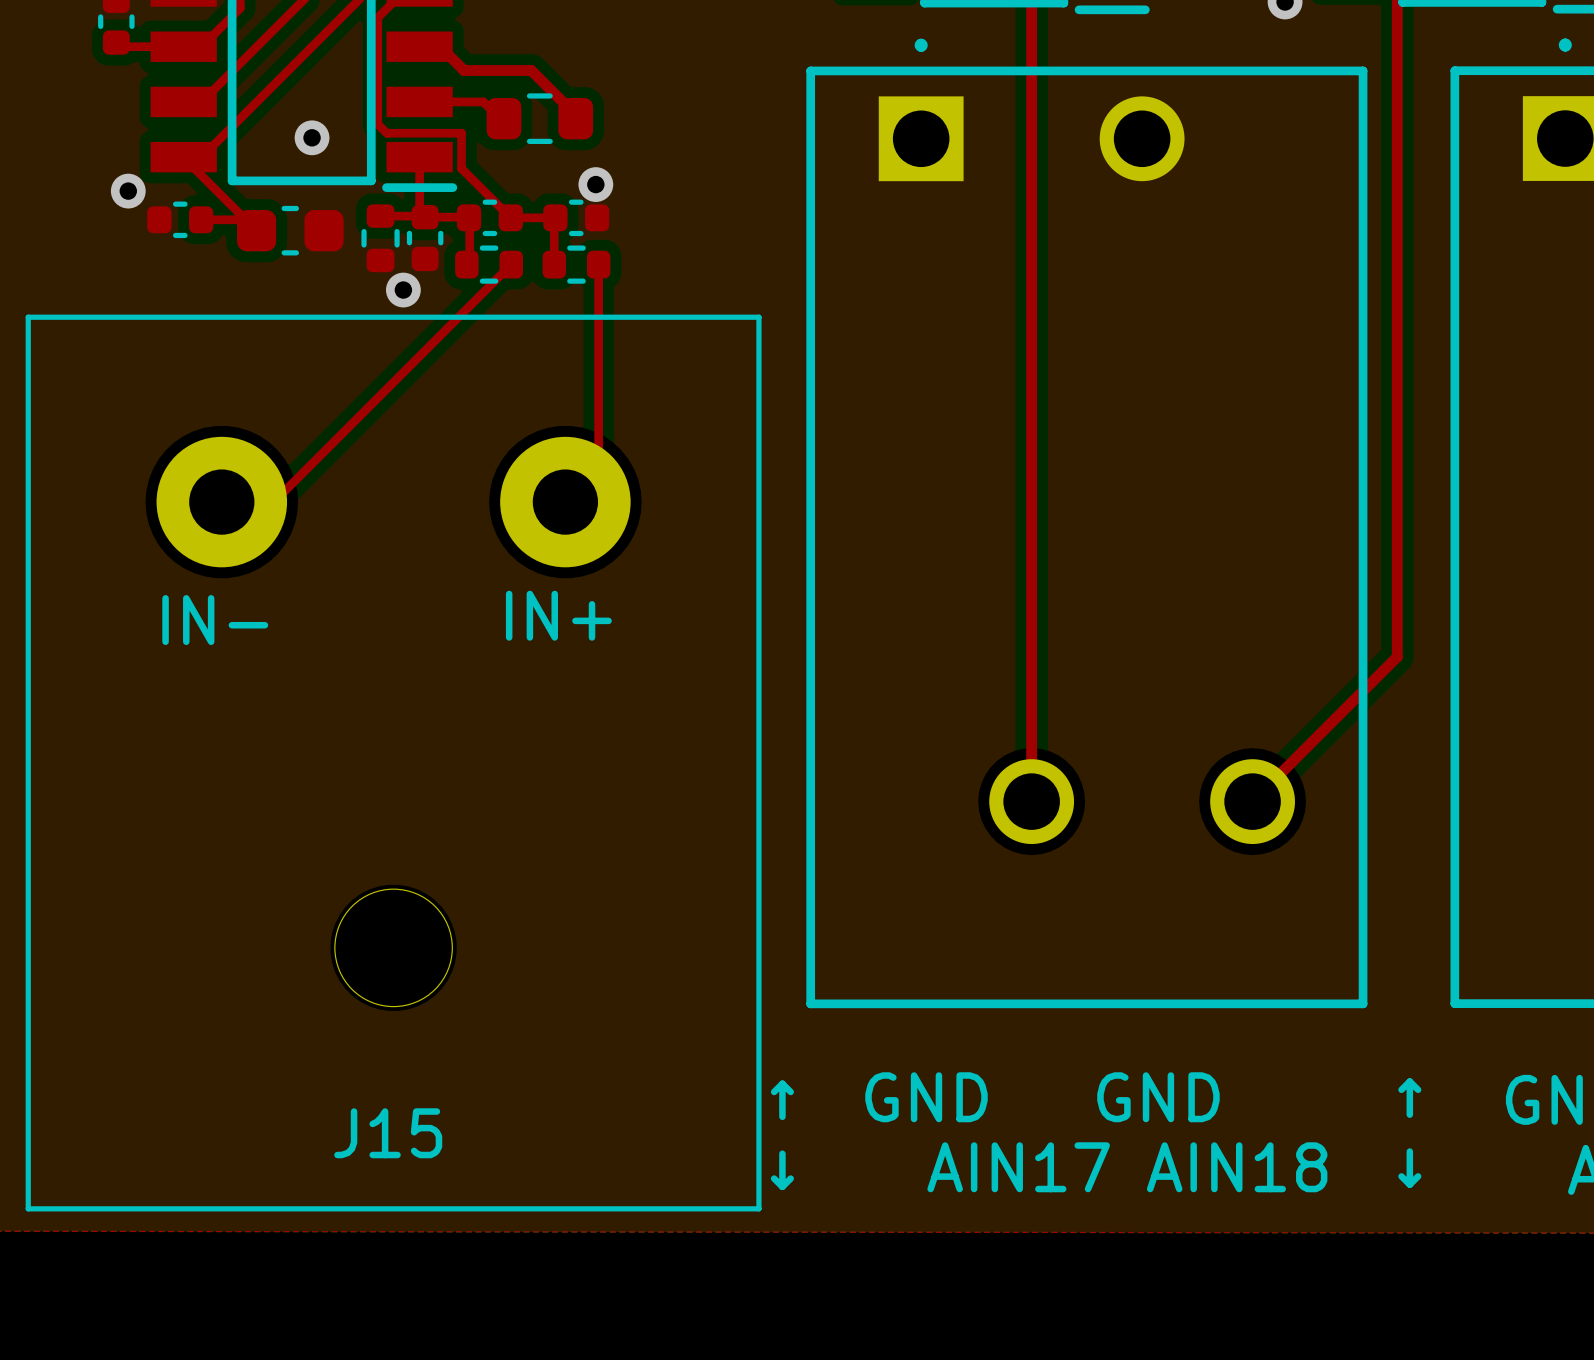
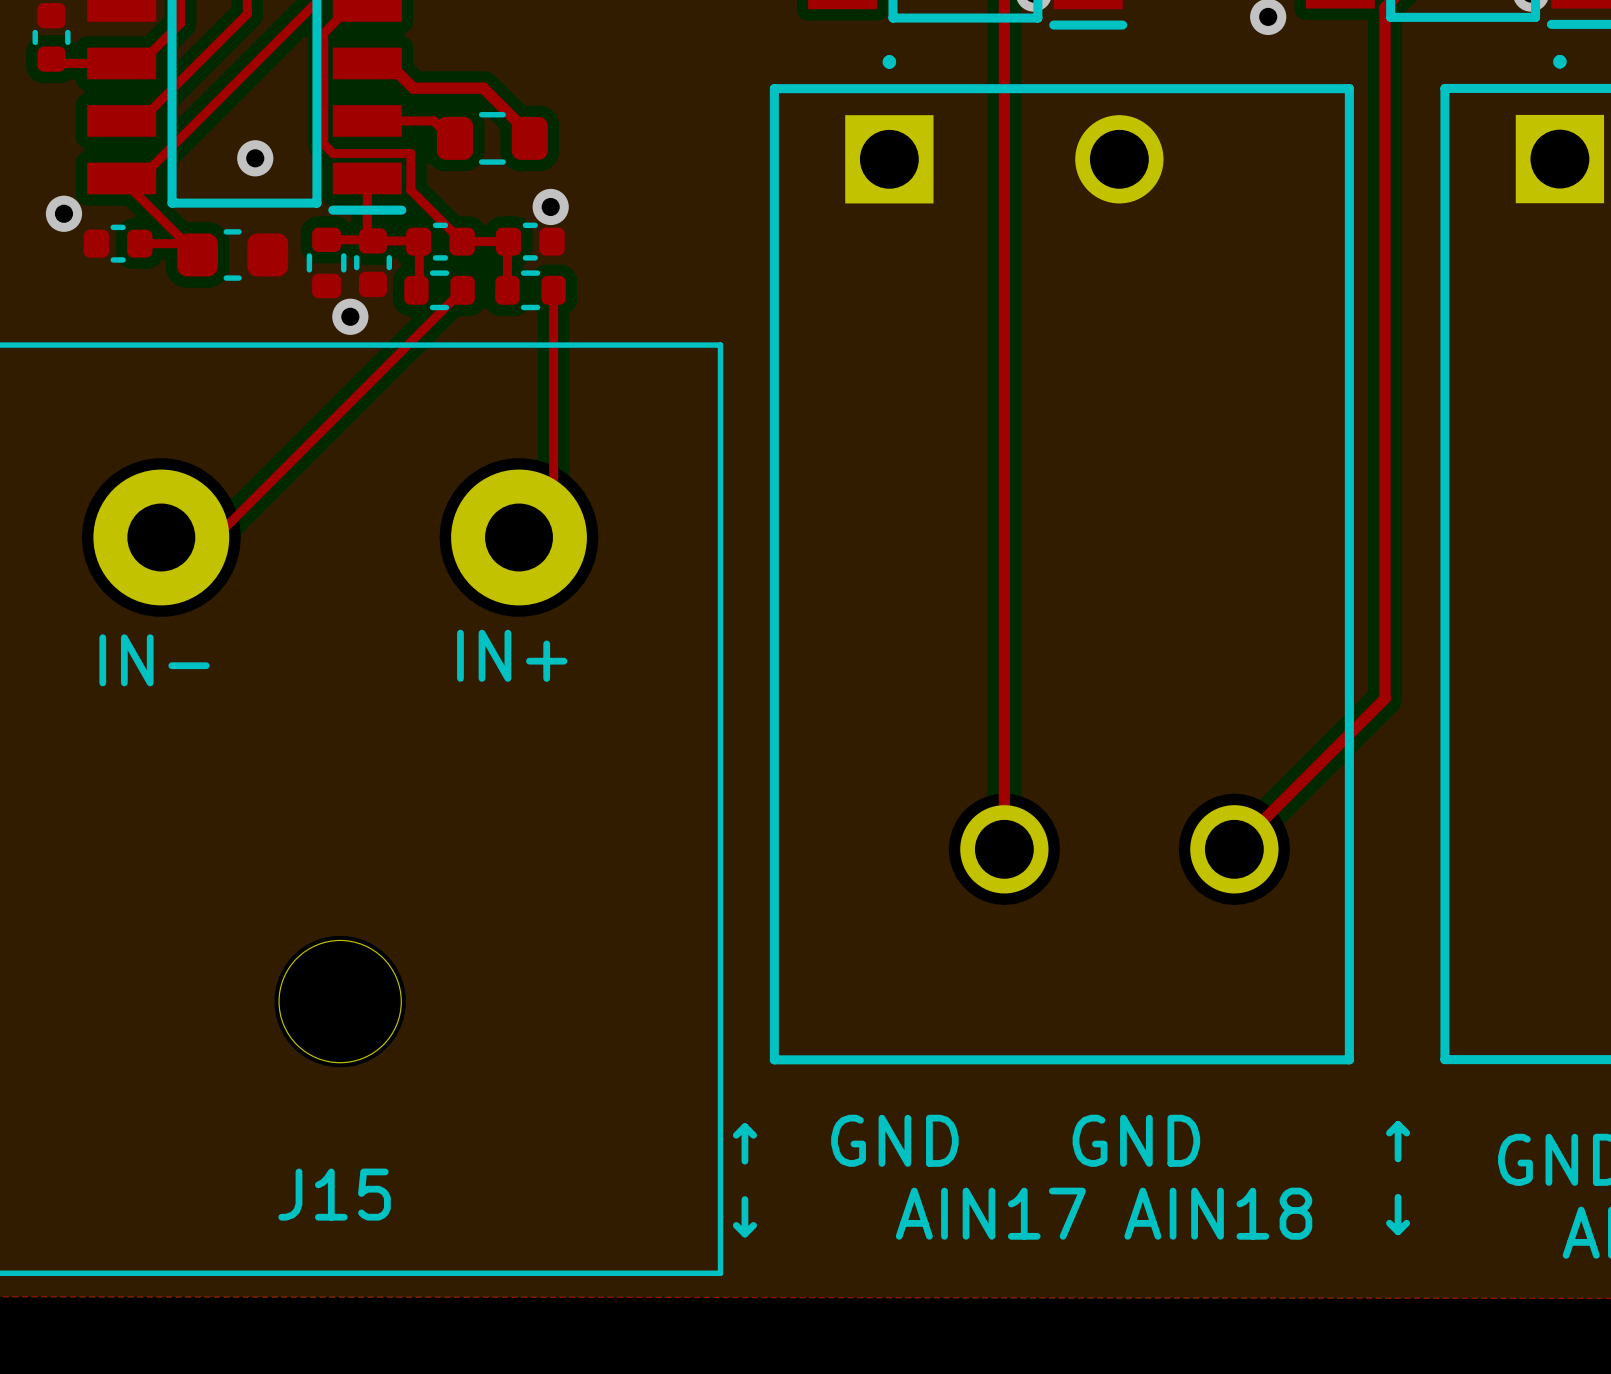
text position: GND GND (1042, 1097) -> GND GND (1015, 1140)
text position: ↑ (1409, 1098) -> ↑ (1398, 1141)
text position: ↑ (782, 1100) -> ↑ (744, 1143)
text position: AIN17 AIN18 (1127, 1167) -> AIN17 AIN18 (1104, 1213)
text position: ↓ (1409, 1168) -> ↓ (1398, 1214)
text position: ↓ (782, 1170) -> ↓ (744, 1216)

